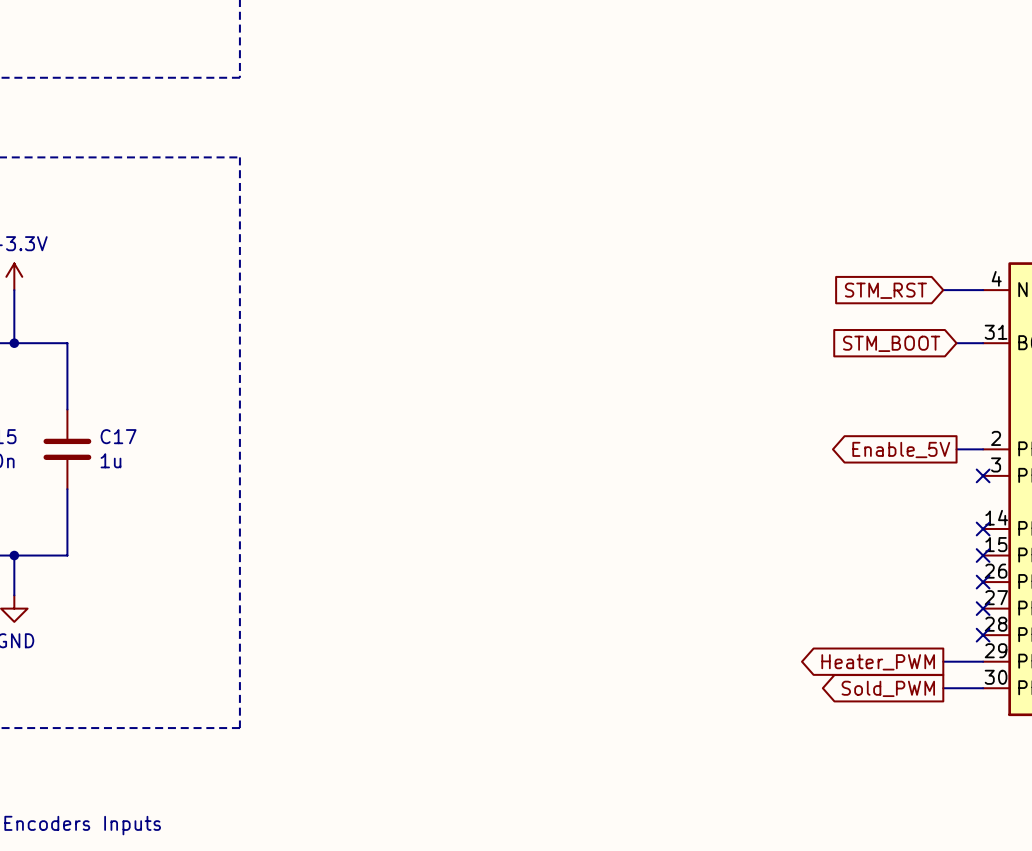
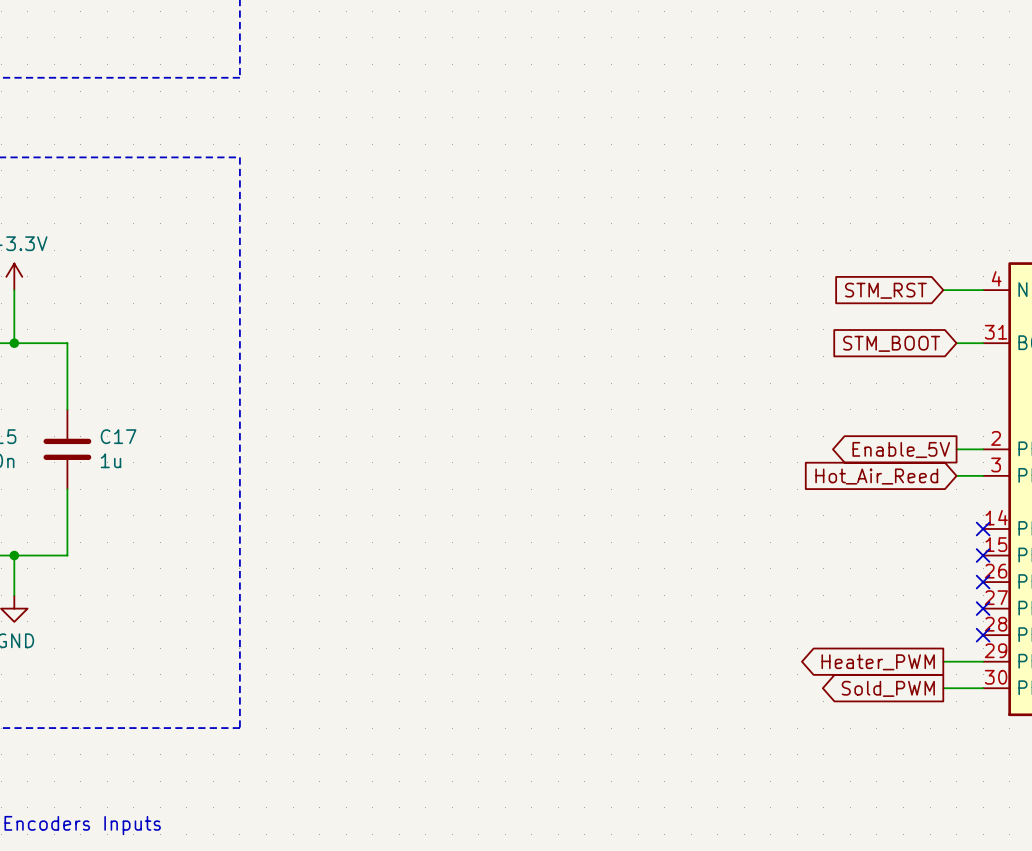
wire: none -> (956, 475) (983, 475)
no-connect mark: (983, 475) -> none
global label: none -> Hot_Air_Reed (876, 476)

